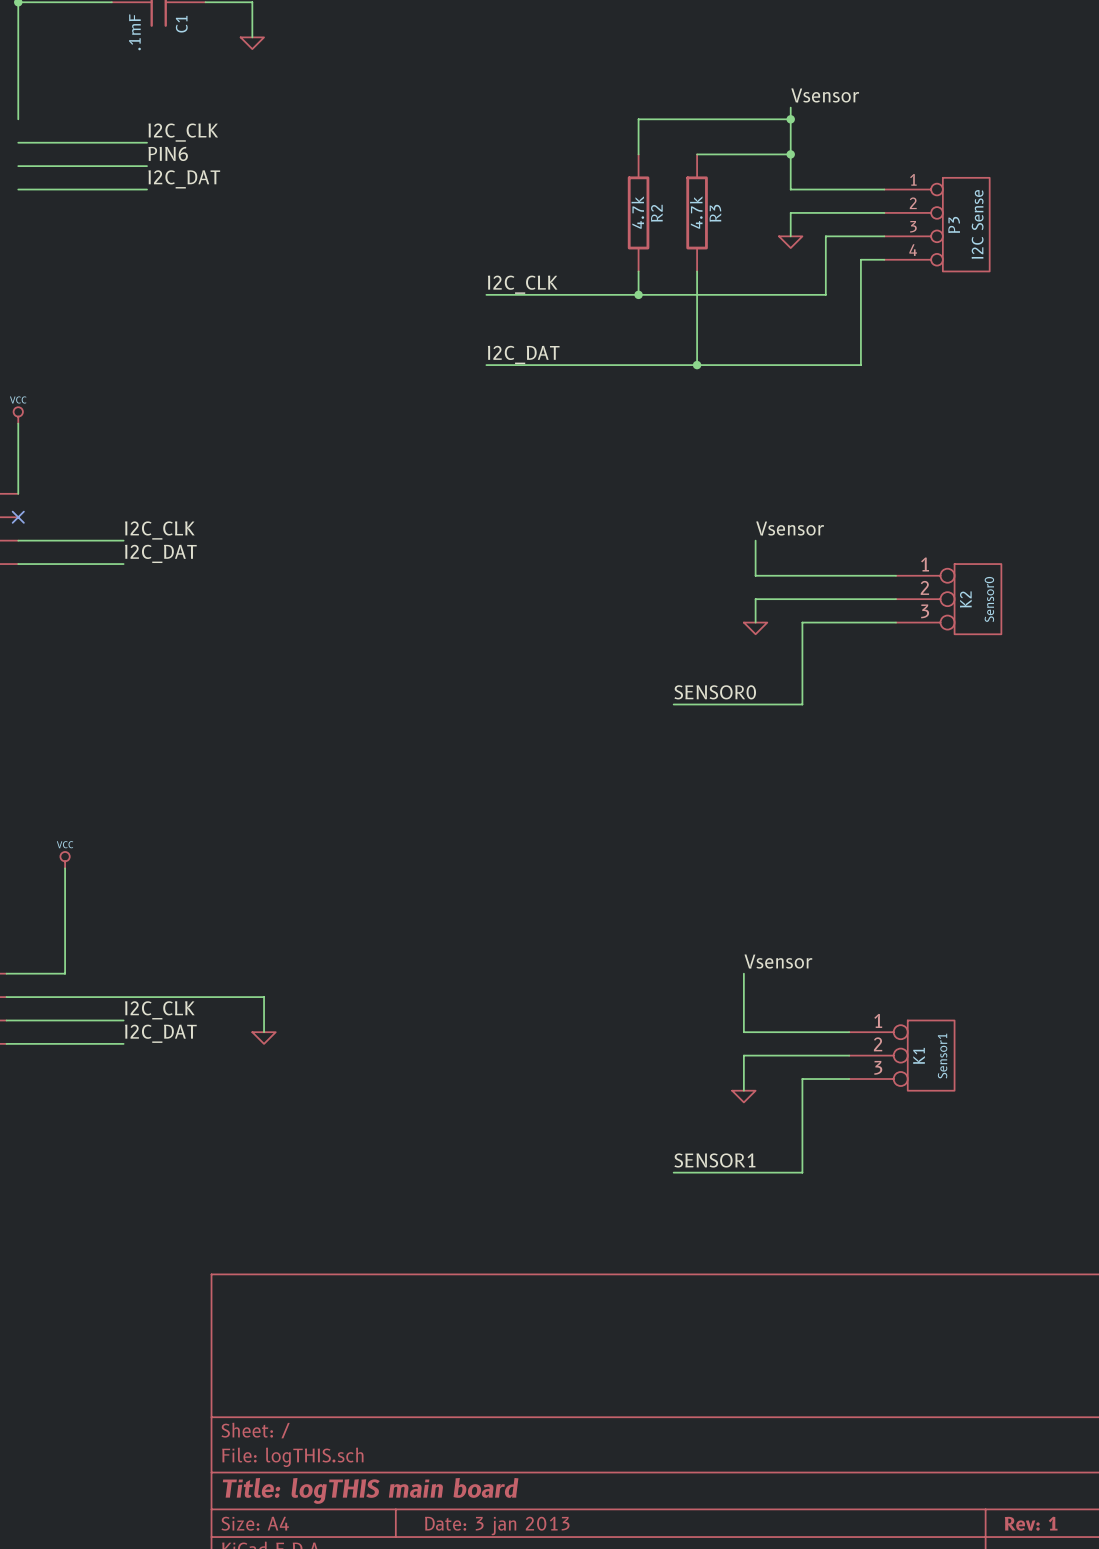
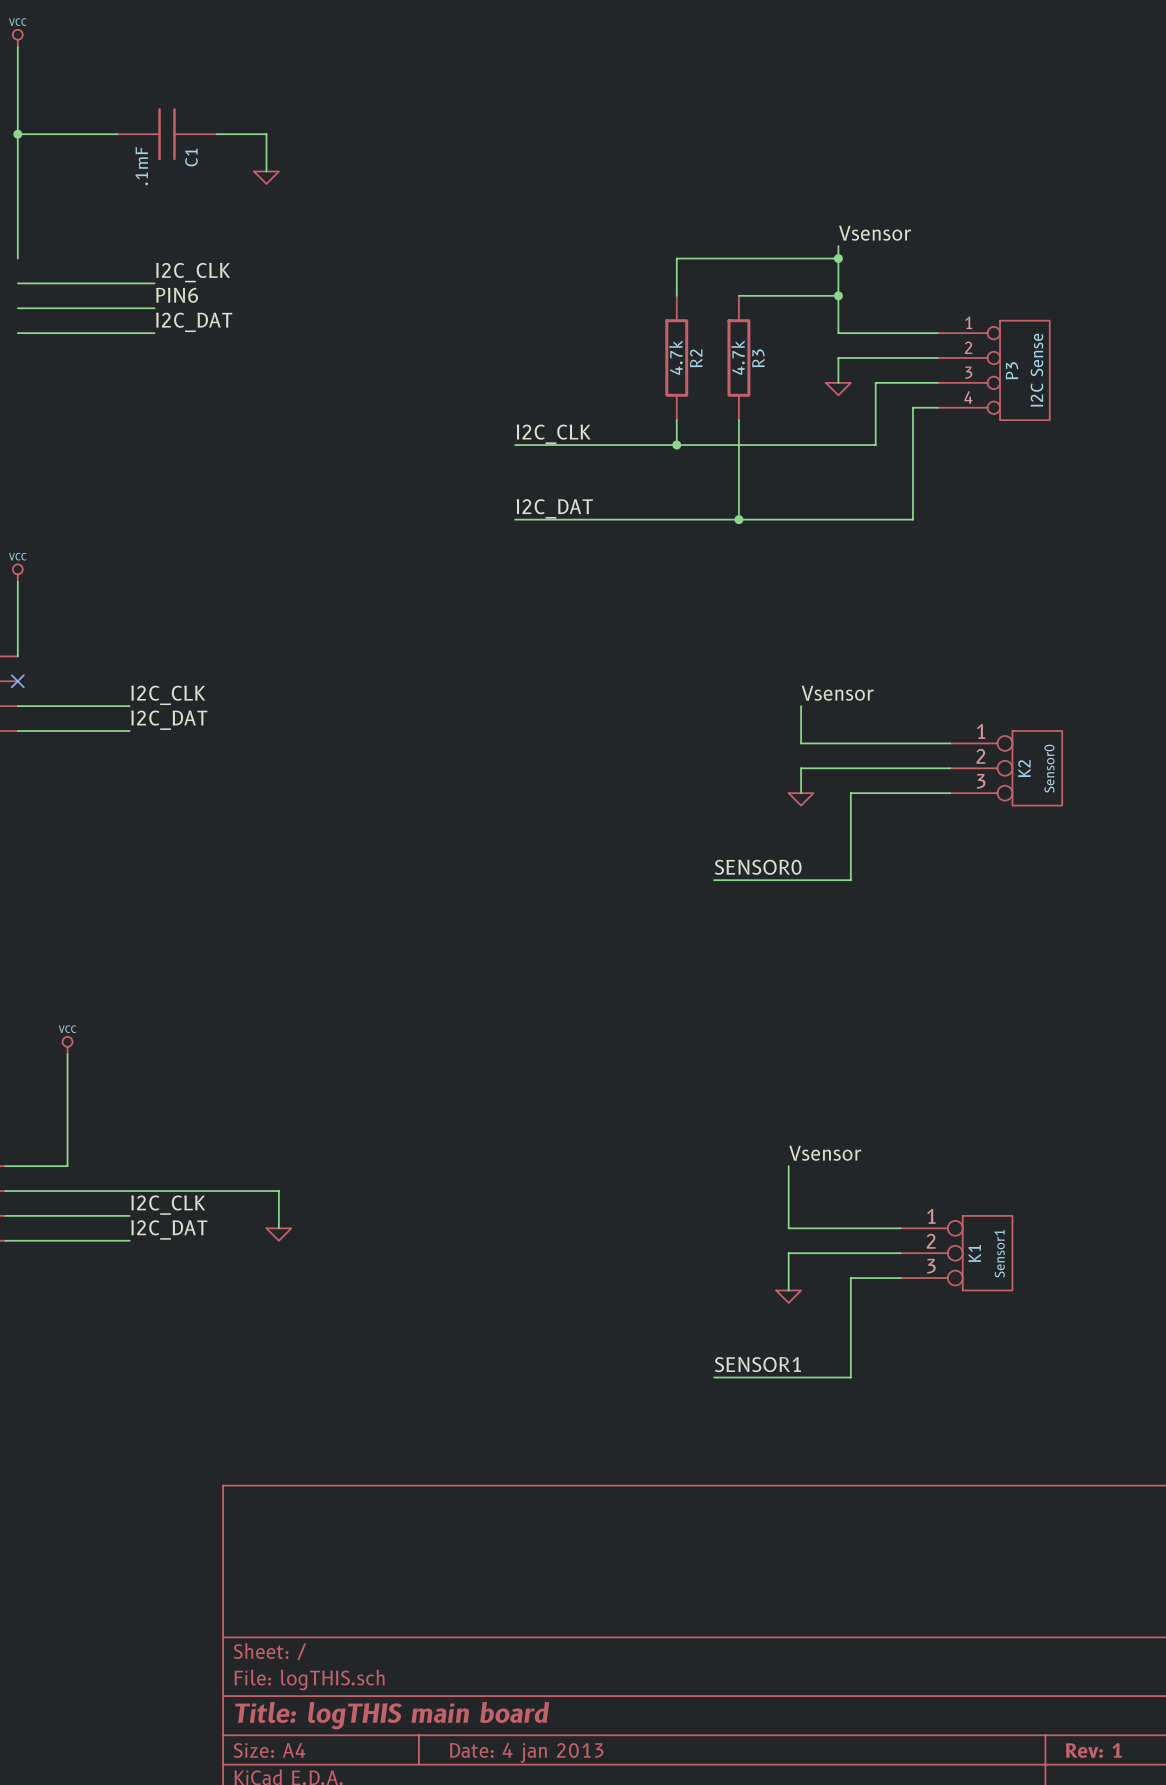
title block: Date: 3 jan 2013 (497, 1525) -> Date: 4 jan 2013 (526, 1752)

